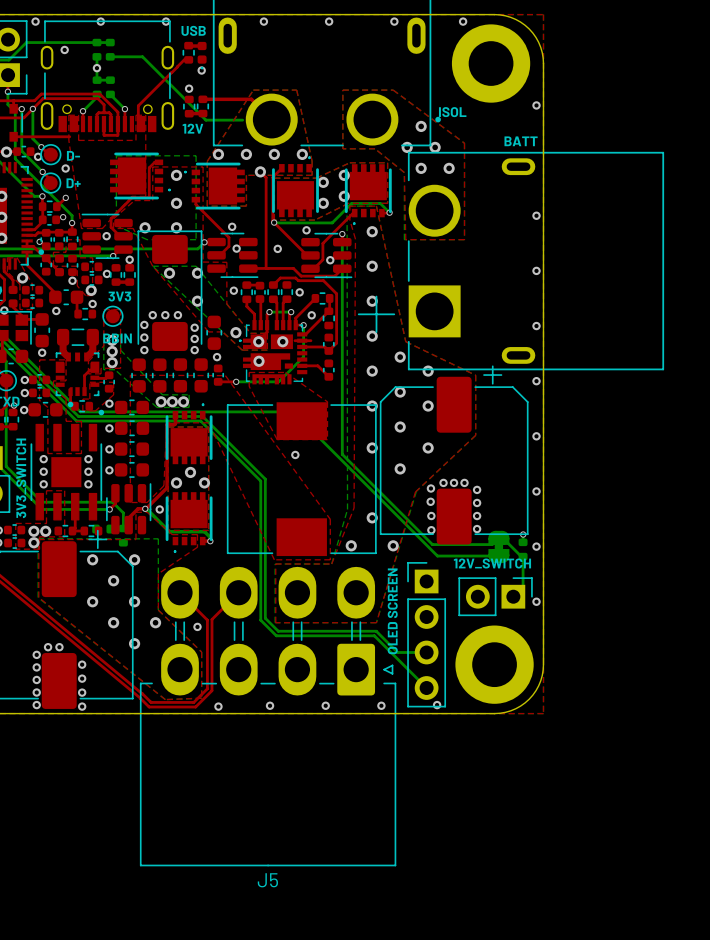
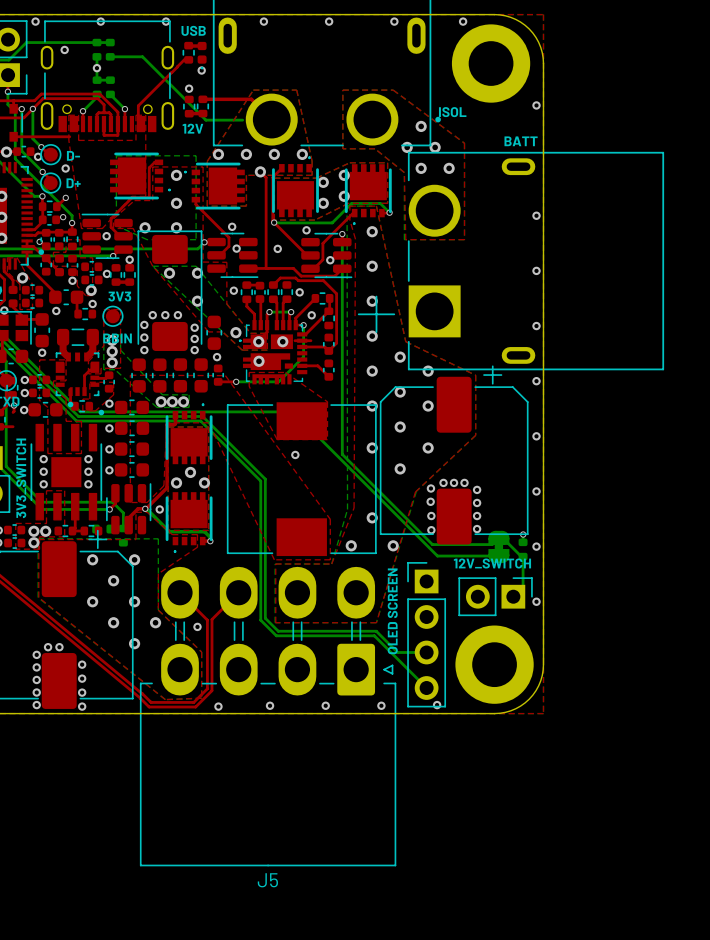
part position: (13, 419) -> (12, 387)

